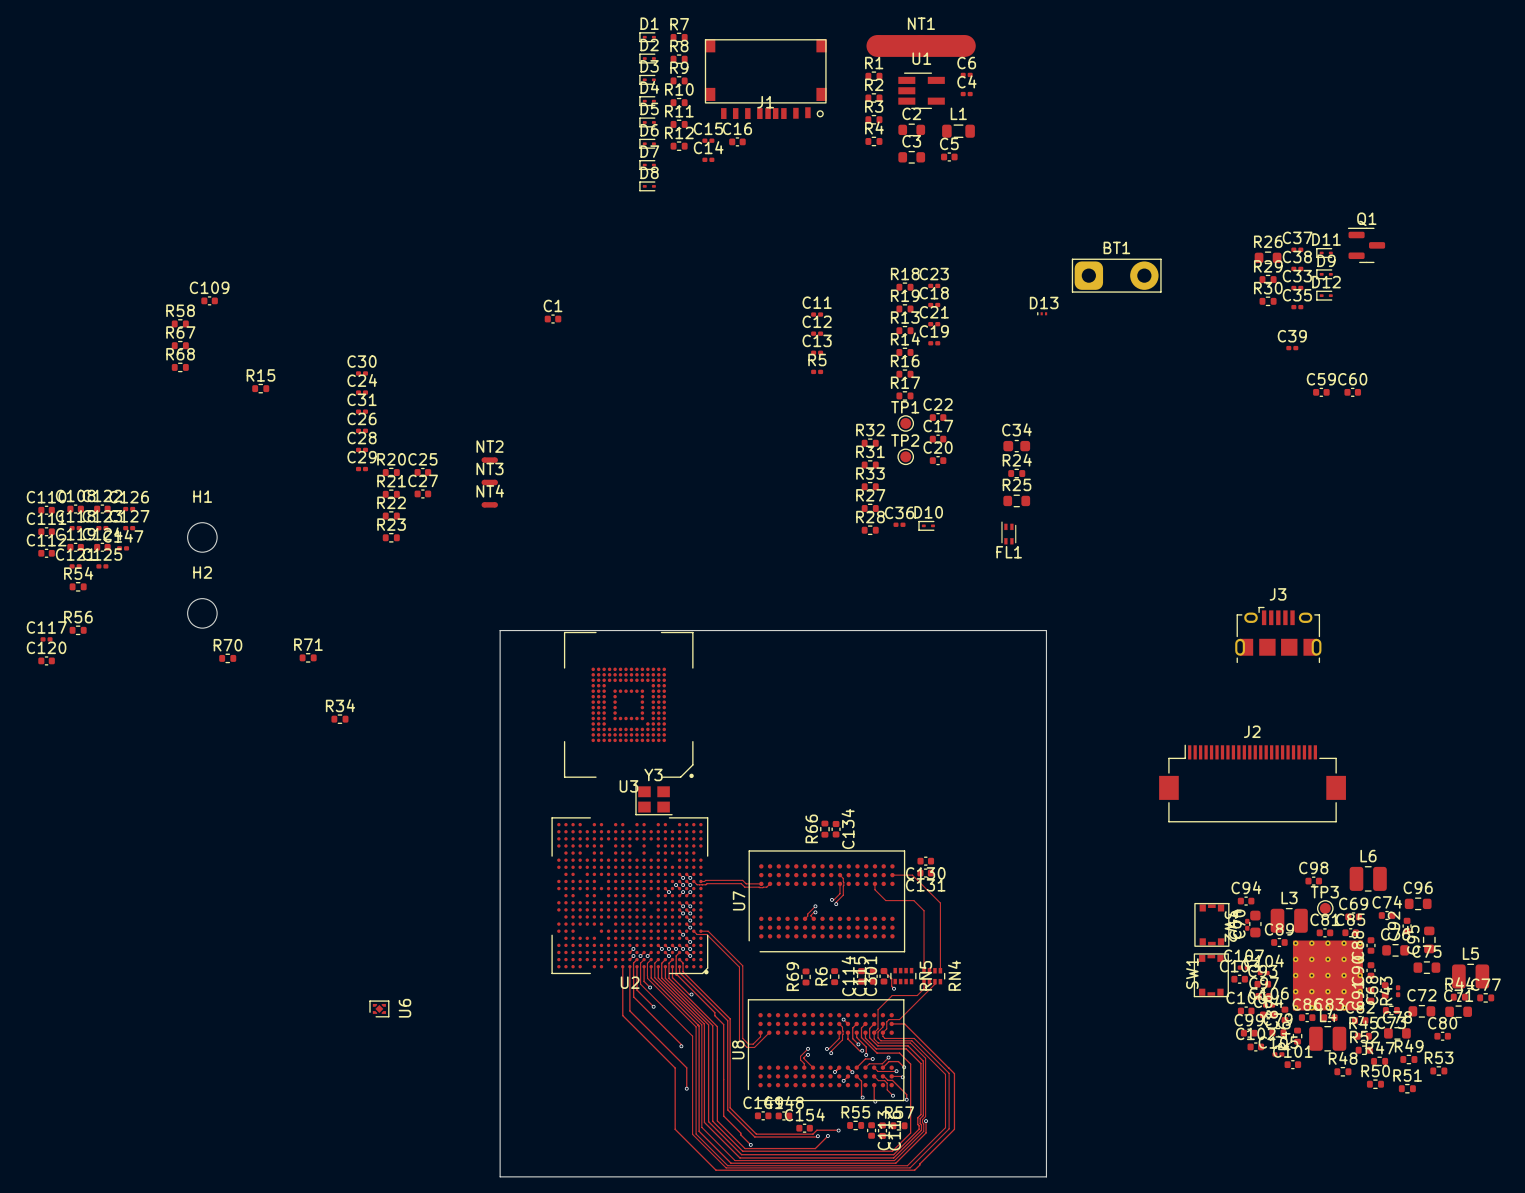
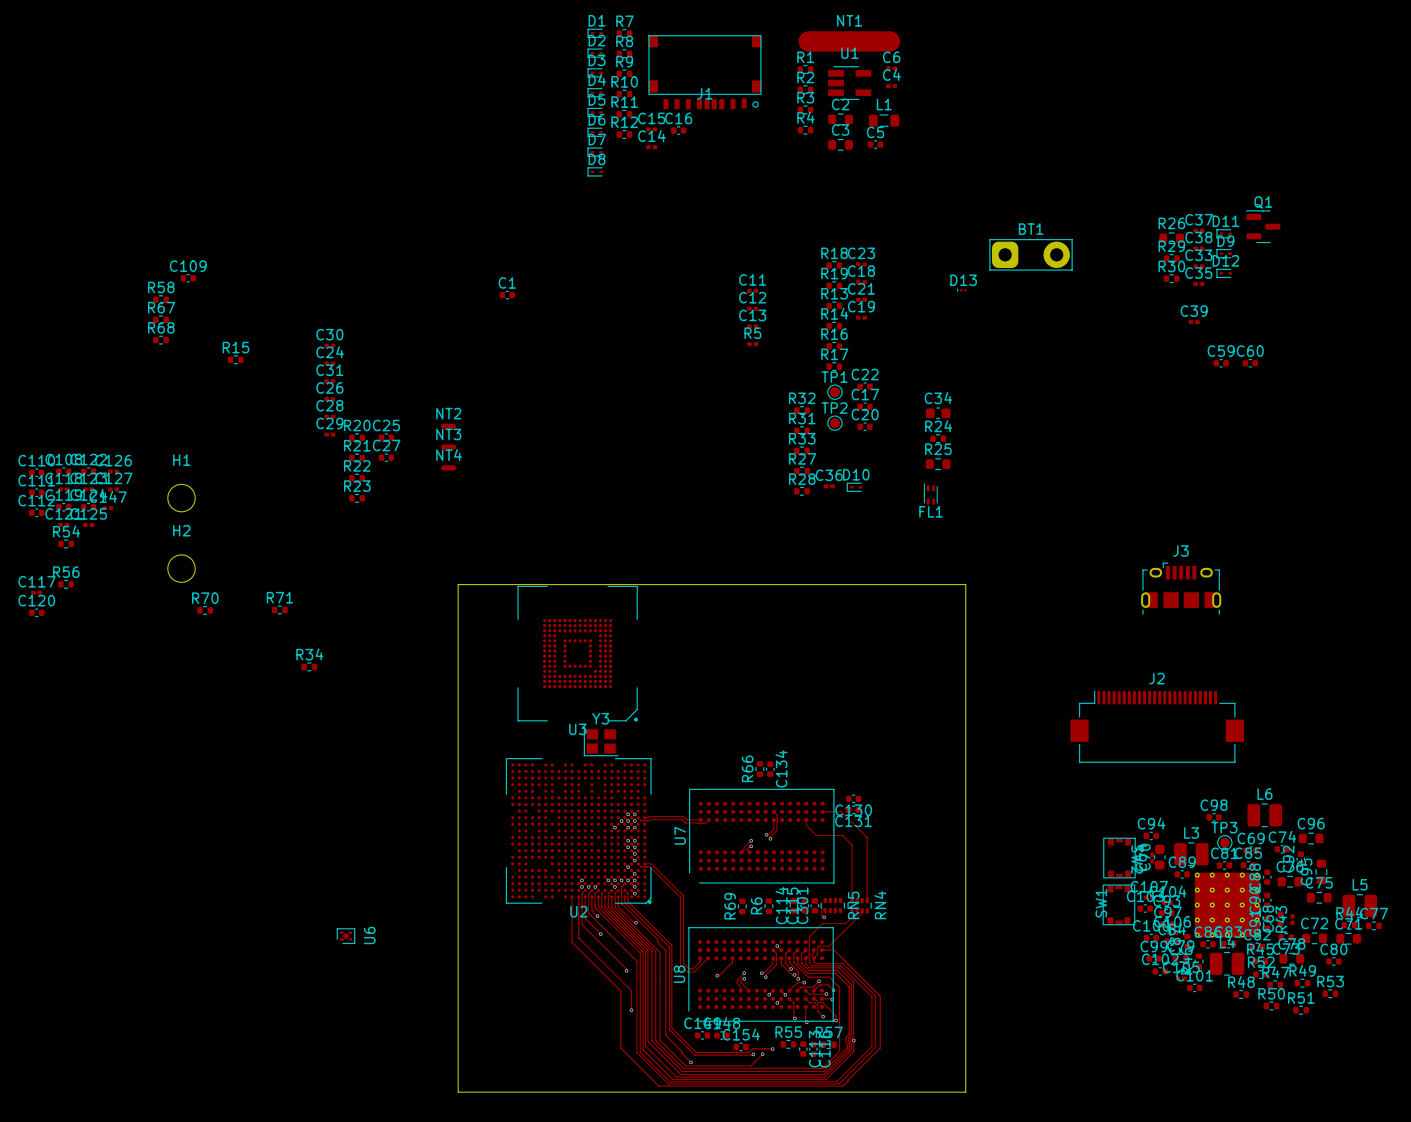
track: none -> (631, 890) (634, 893)
via: none -> (634, 893)
track: none -> (732, 958) (732, 962) (717, 975)
via: none -> (717, 975)

